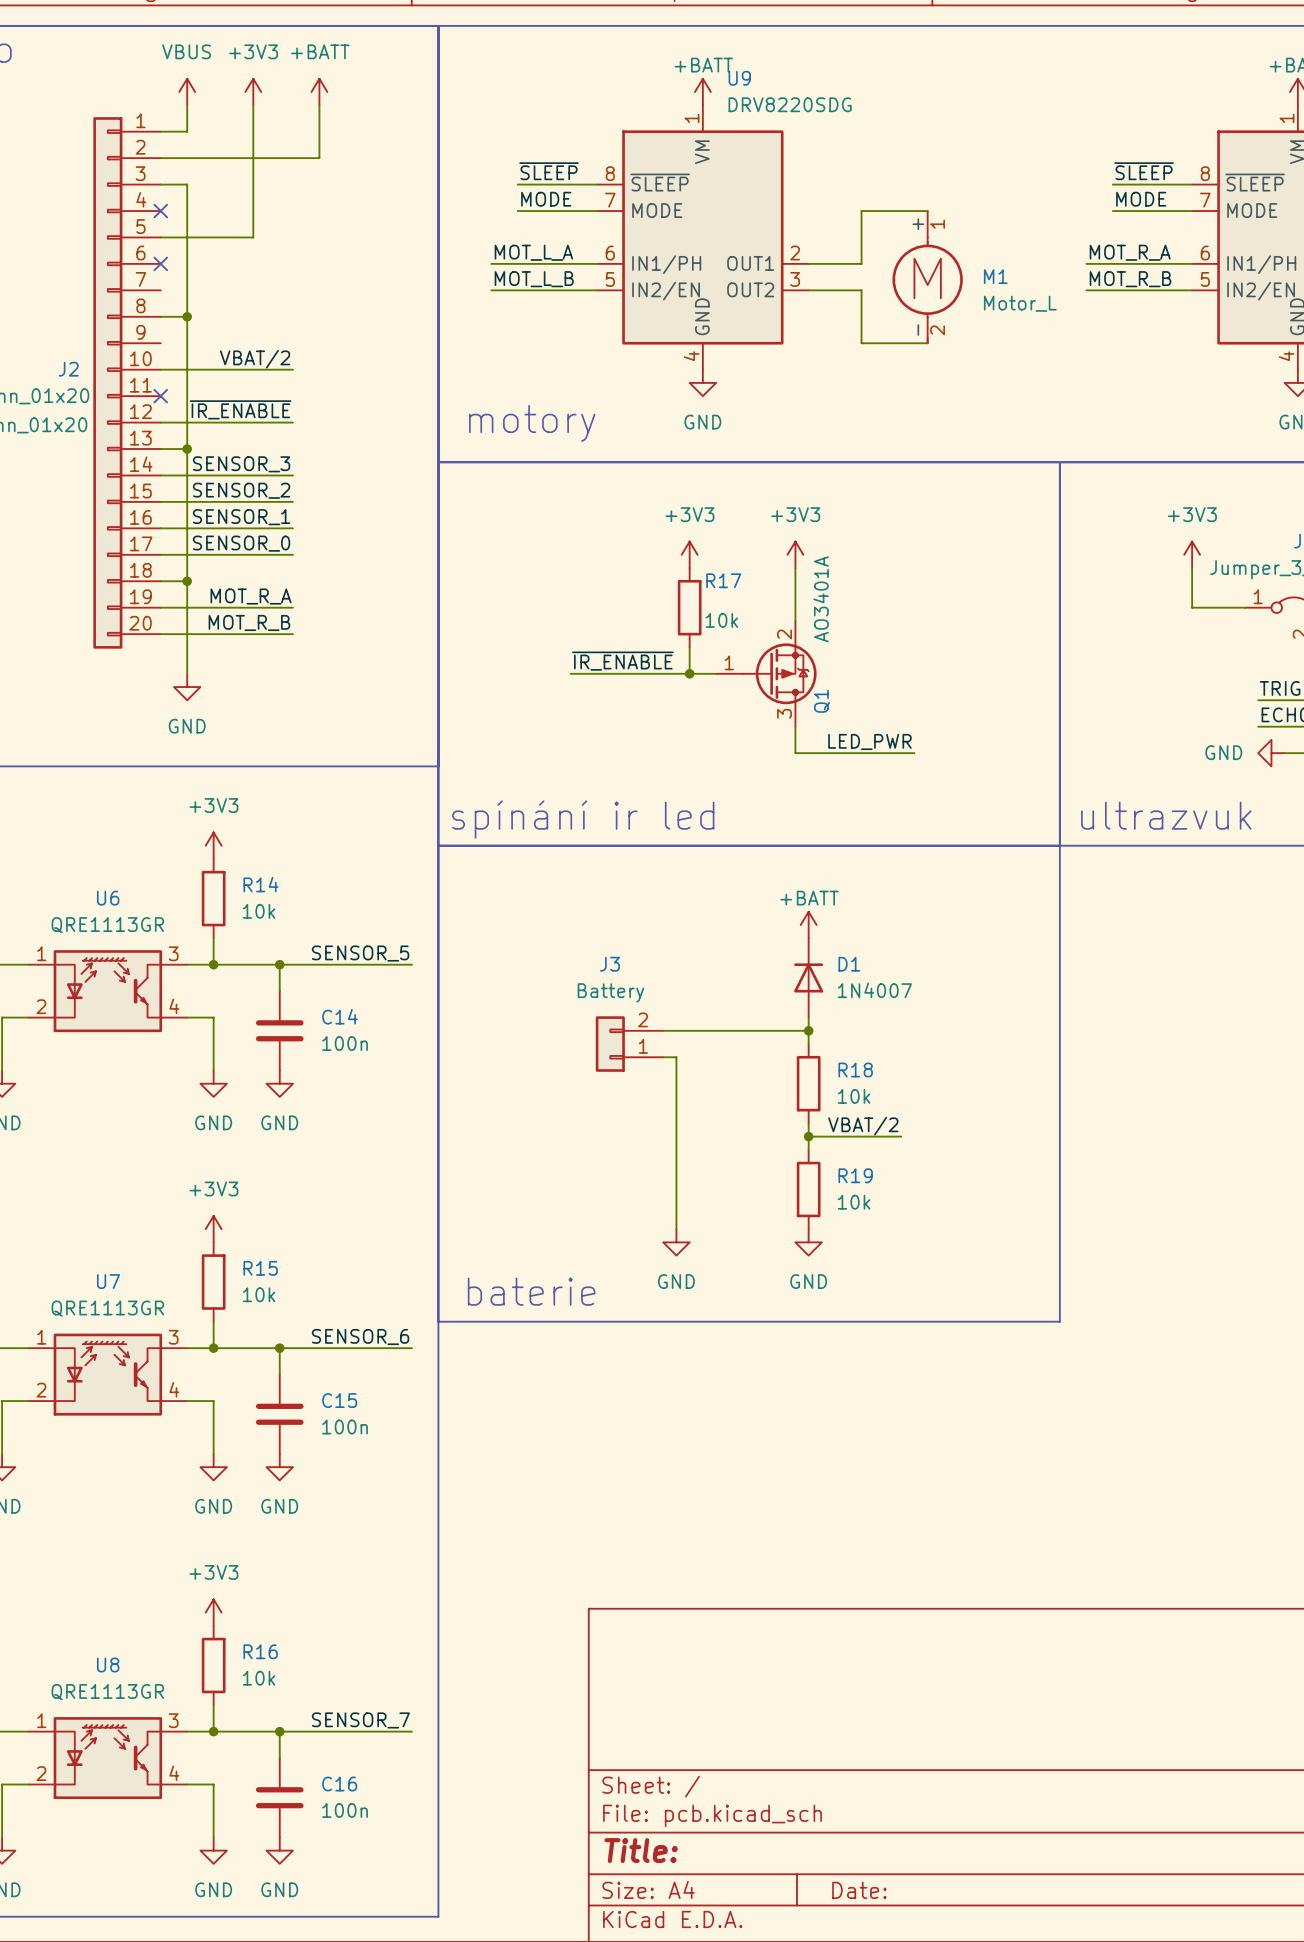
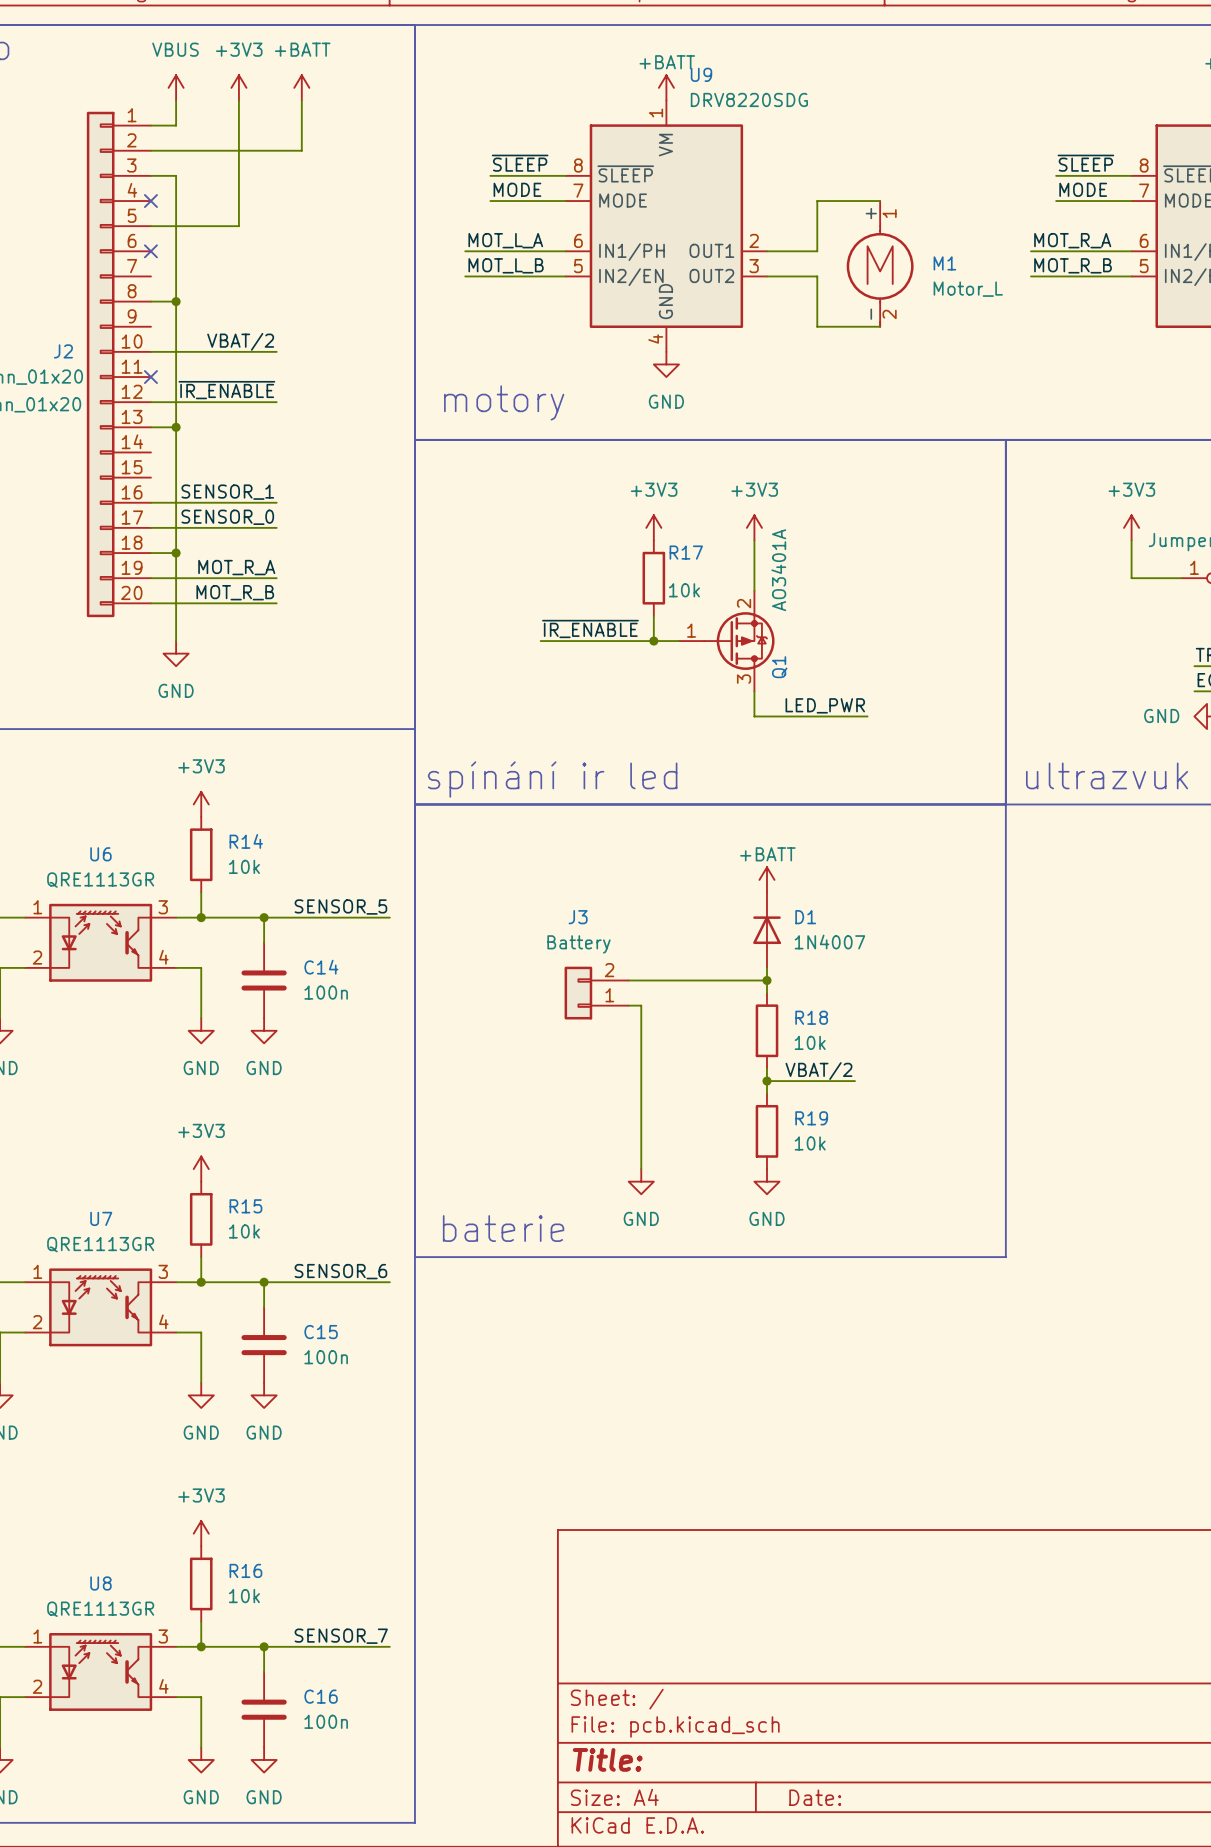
label: SENSOR_3 (241, 464) -> none
wire: (160, 475) (292, 475) -> none
label: SENSOR_2 (241, 490) -> none
wire: (160, 501) (292, 501) -> none

